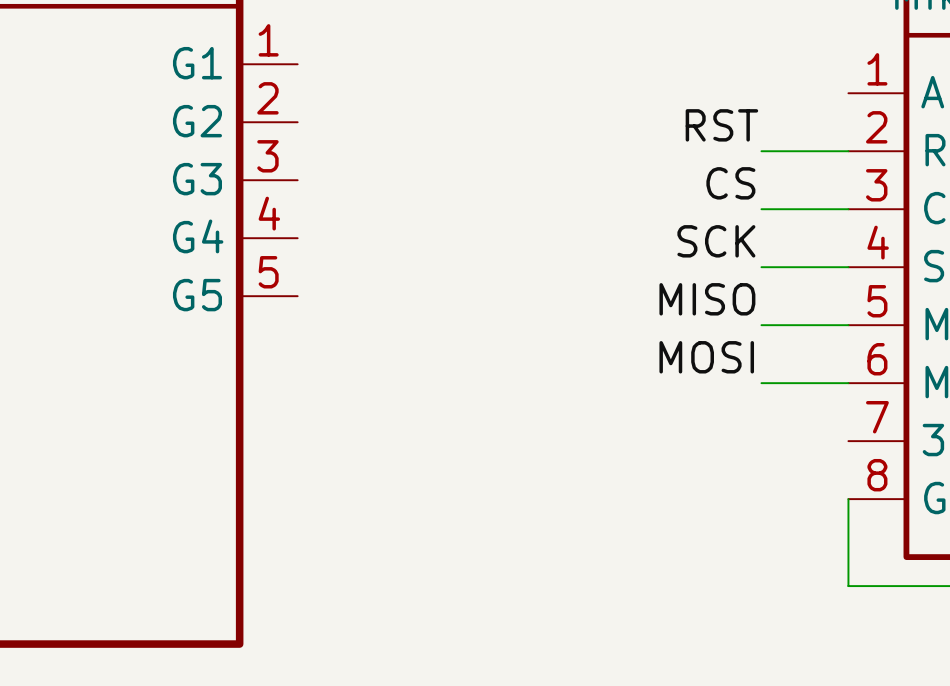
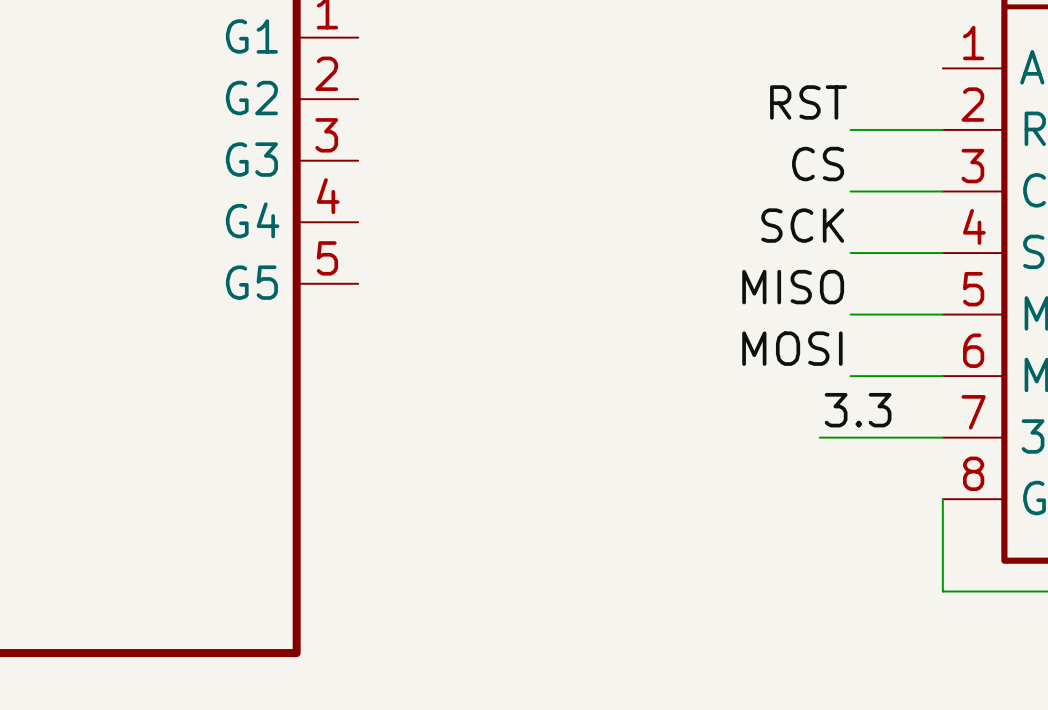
label: none -> 3.3 (858, 410)
wire: none -> (819, 437) (942, 437)

